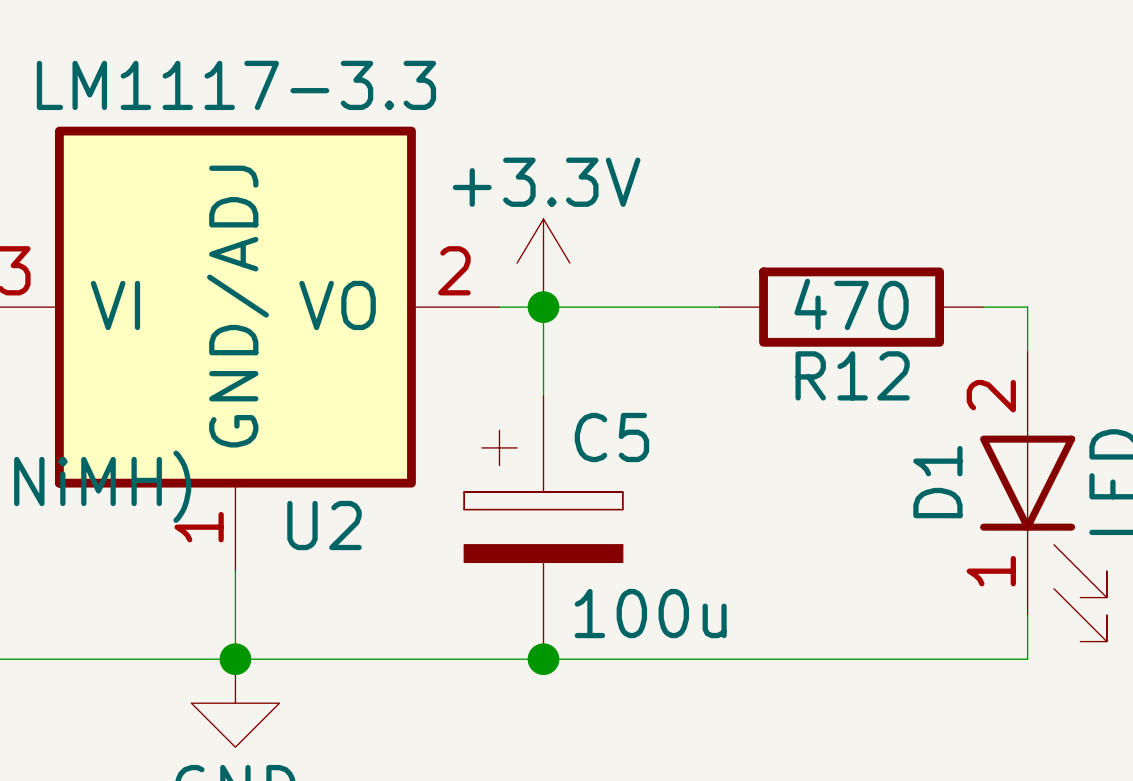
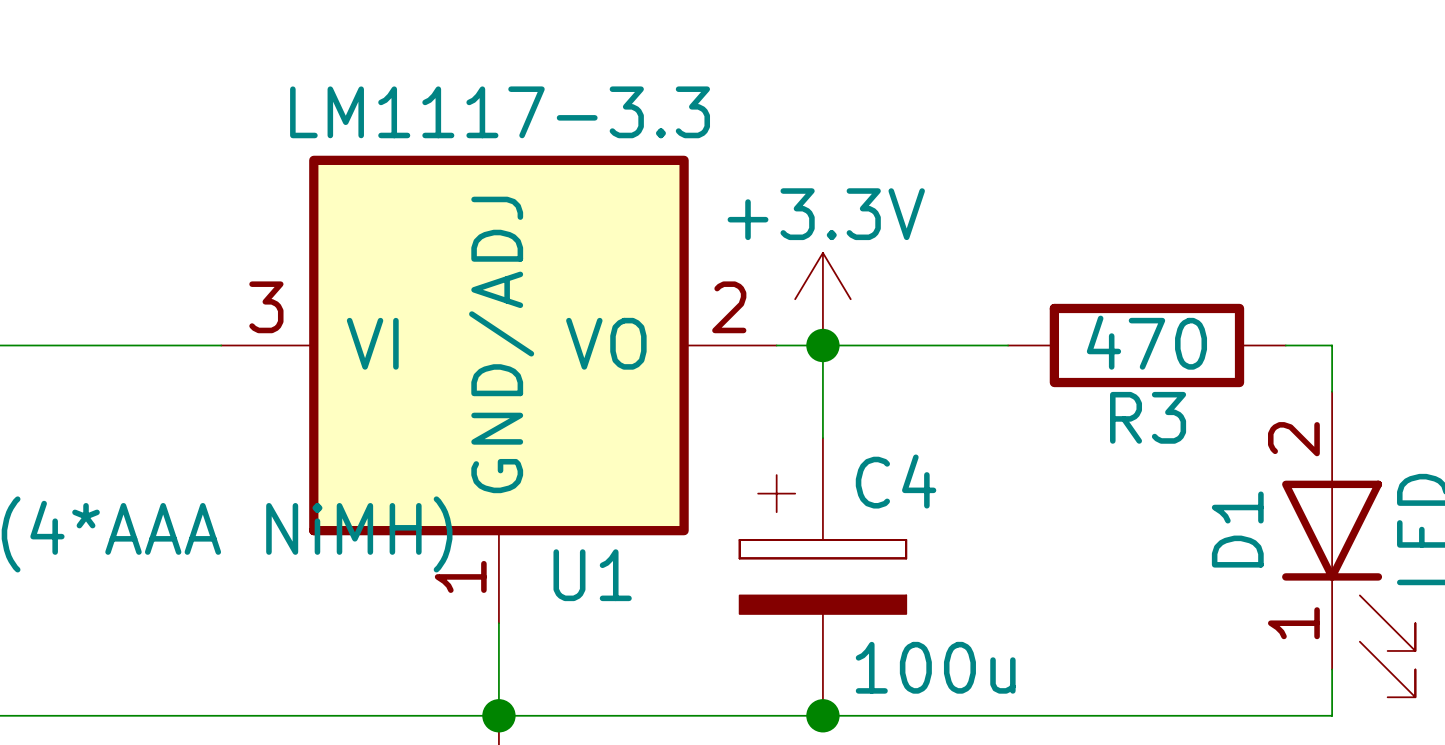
R12 name: R12 (852, 375) -> R3 (1148, 417)
C5 name: C5 (611, 437) -> C4 (896, 481)
U2 name: U2 (324, 525) -> U1 (592, 575)

